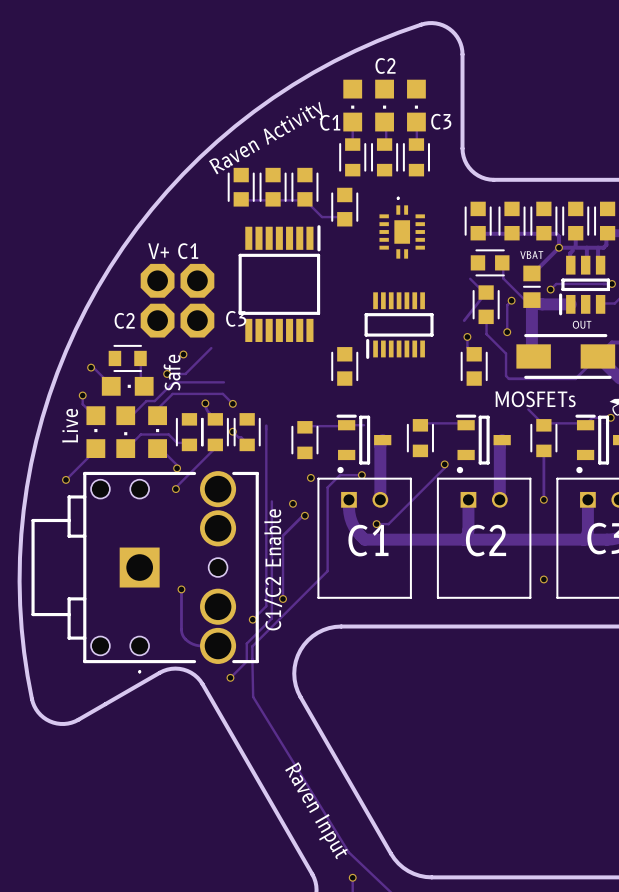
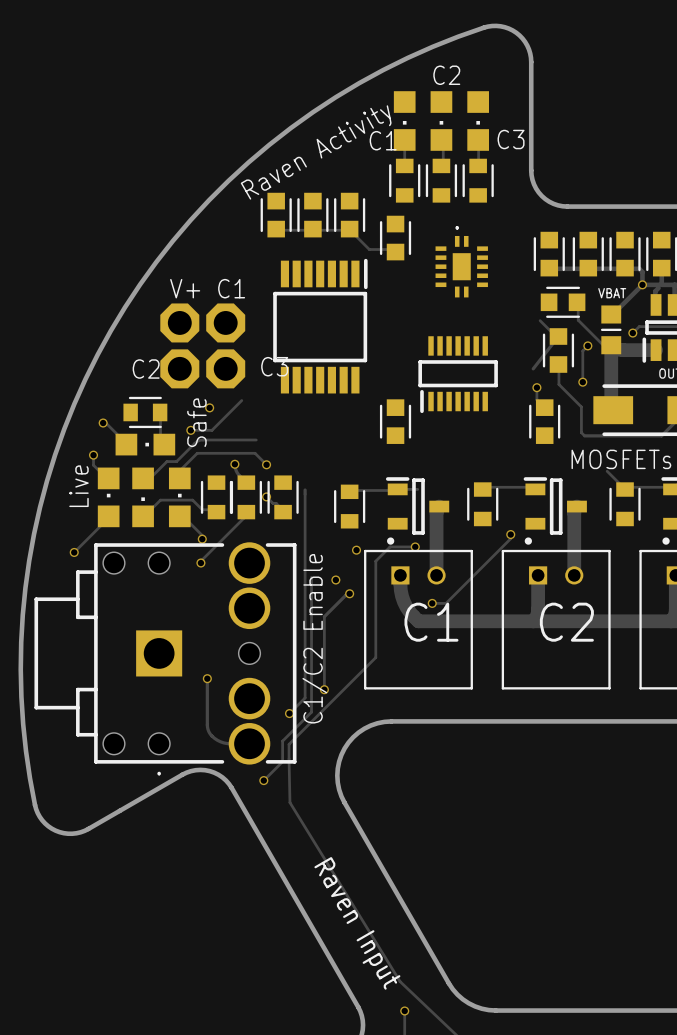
track: (543, 450) (543, 499) -> none
via: (543, 499) -> none
via: (543, 579) -> none

